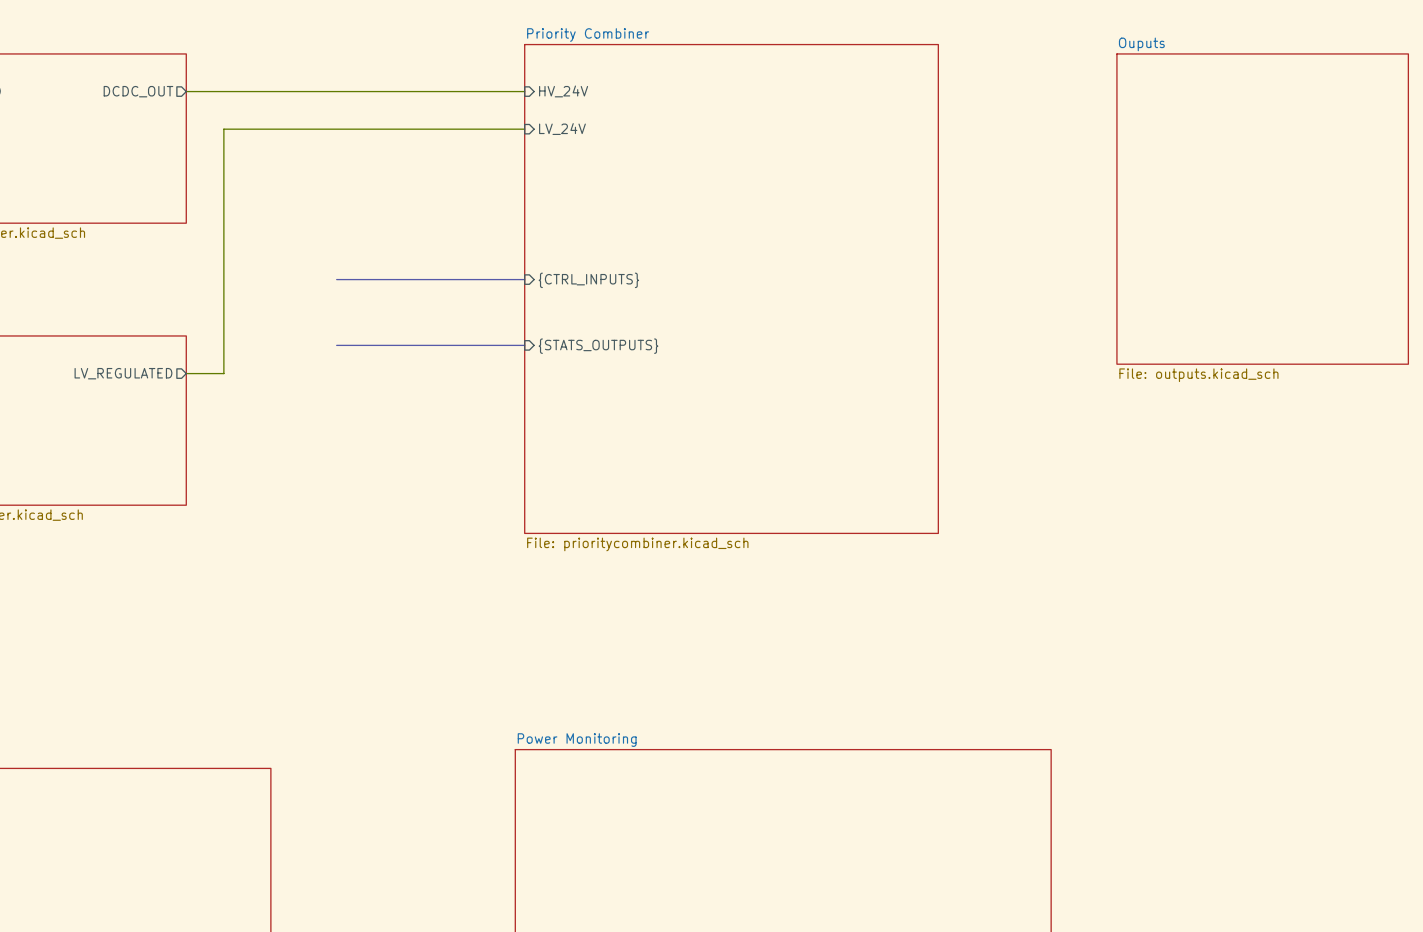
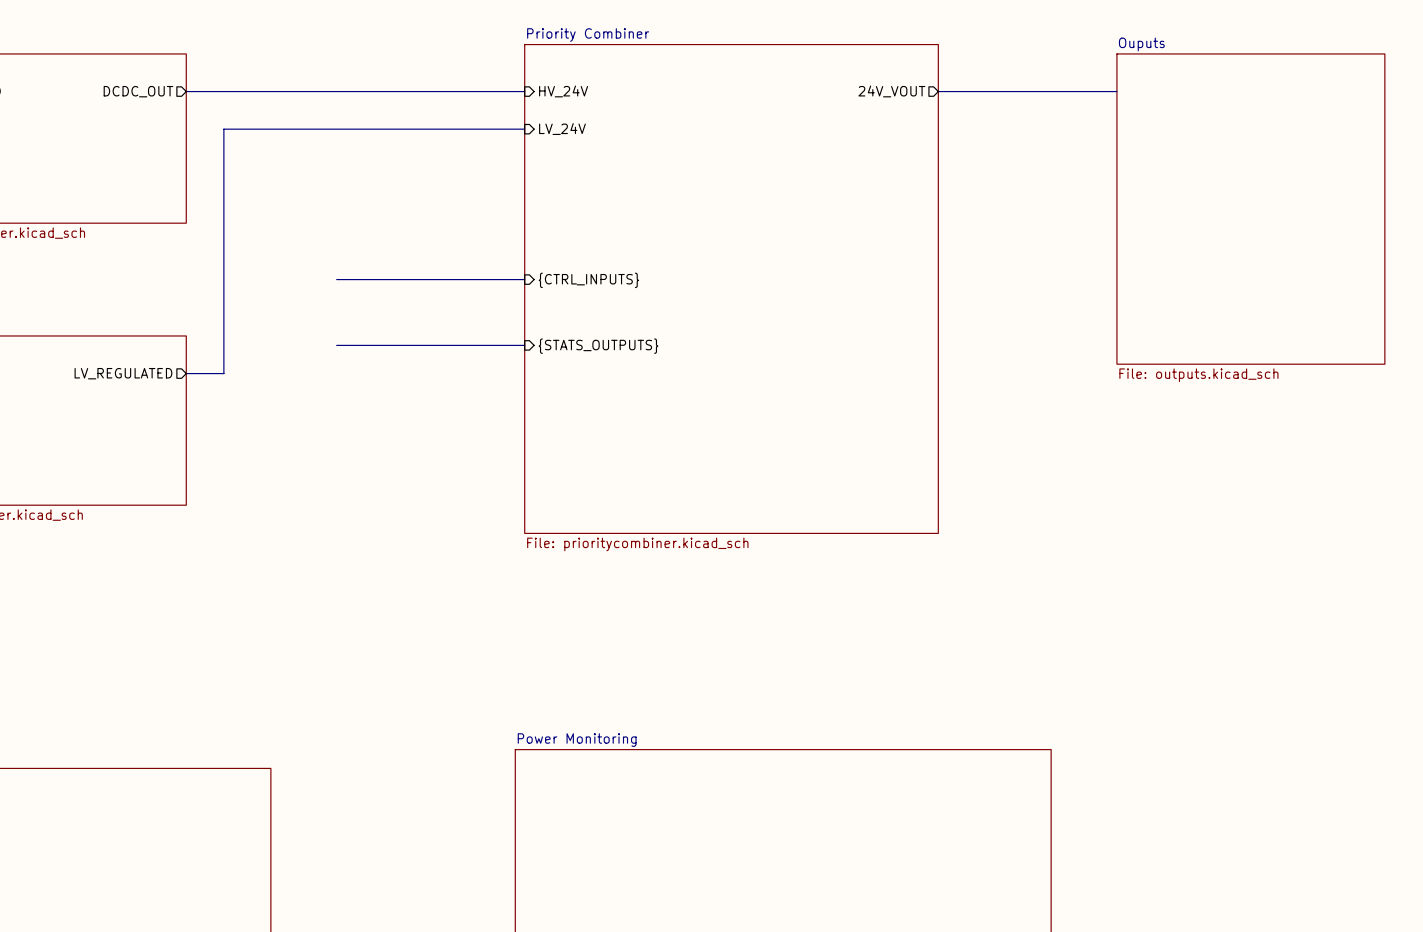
sheet pin: none -> 24V_VOUT (891, 91)
wire: none -> (938, 91) (1116, 91)
sheet Ouputs: none -> File: outputs.kicad_sch (1250, 209)
sheet Ouputs: File: outputs.kicad_sch (1262, 209) -> none

